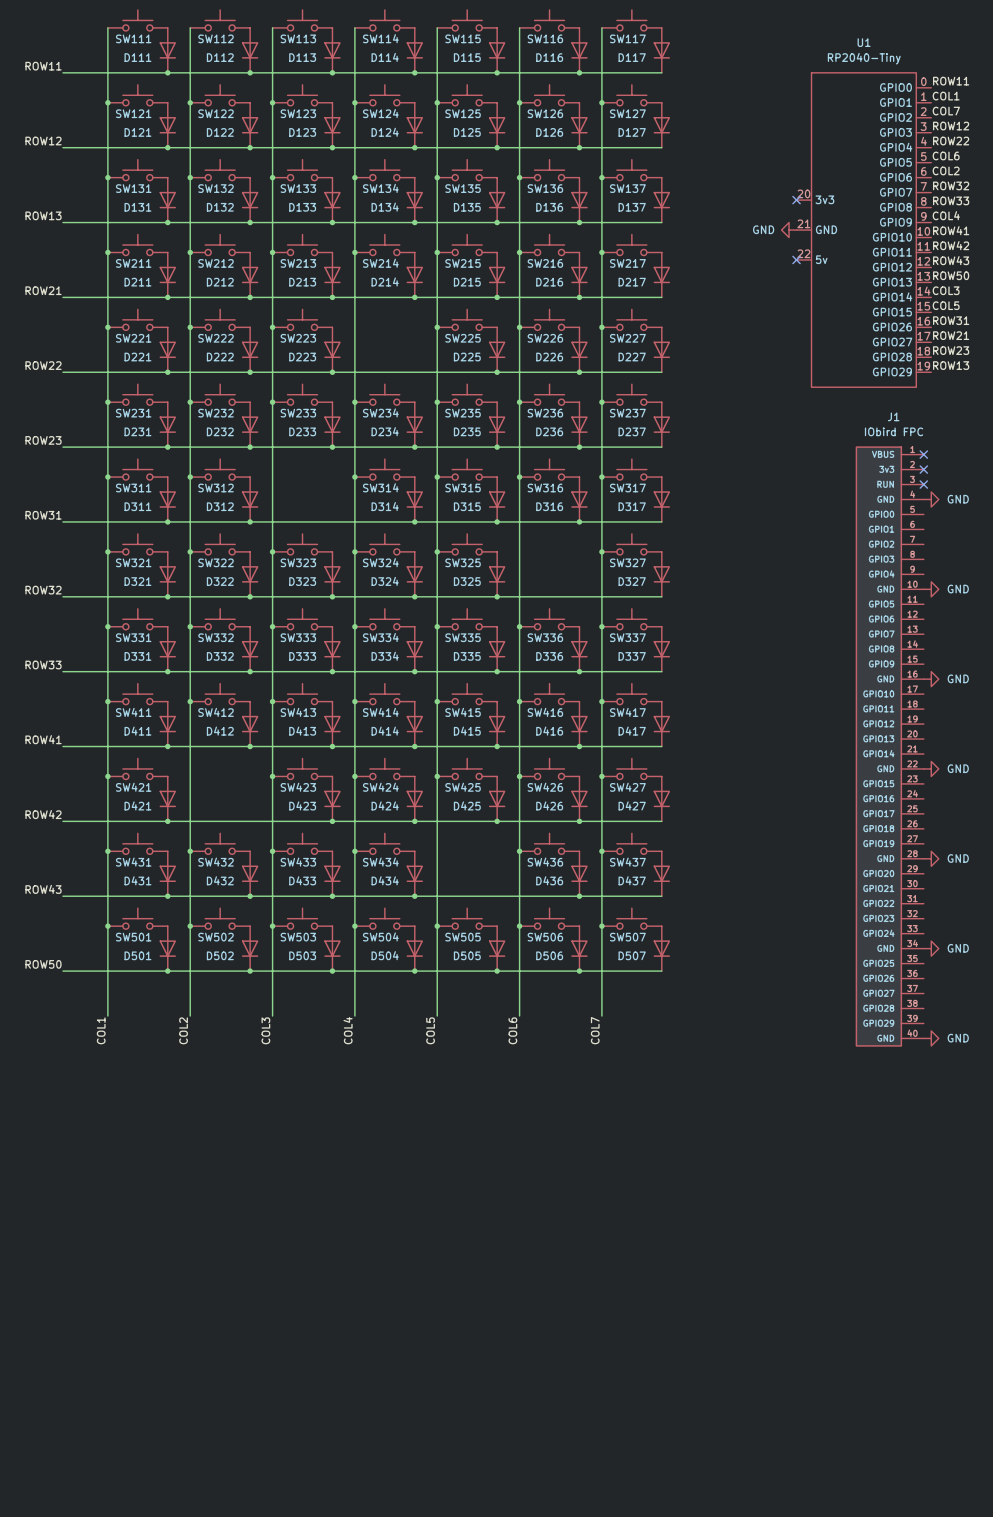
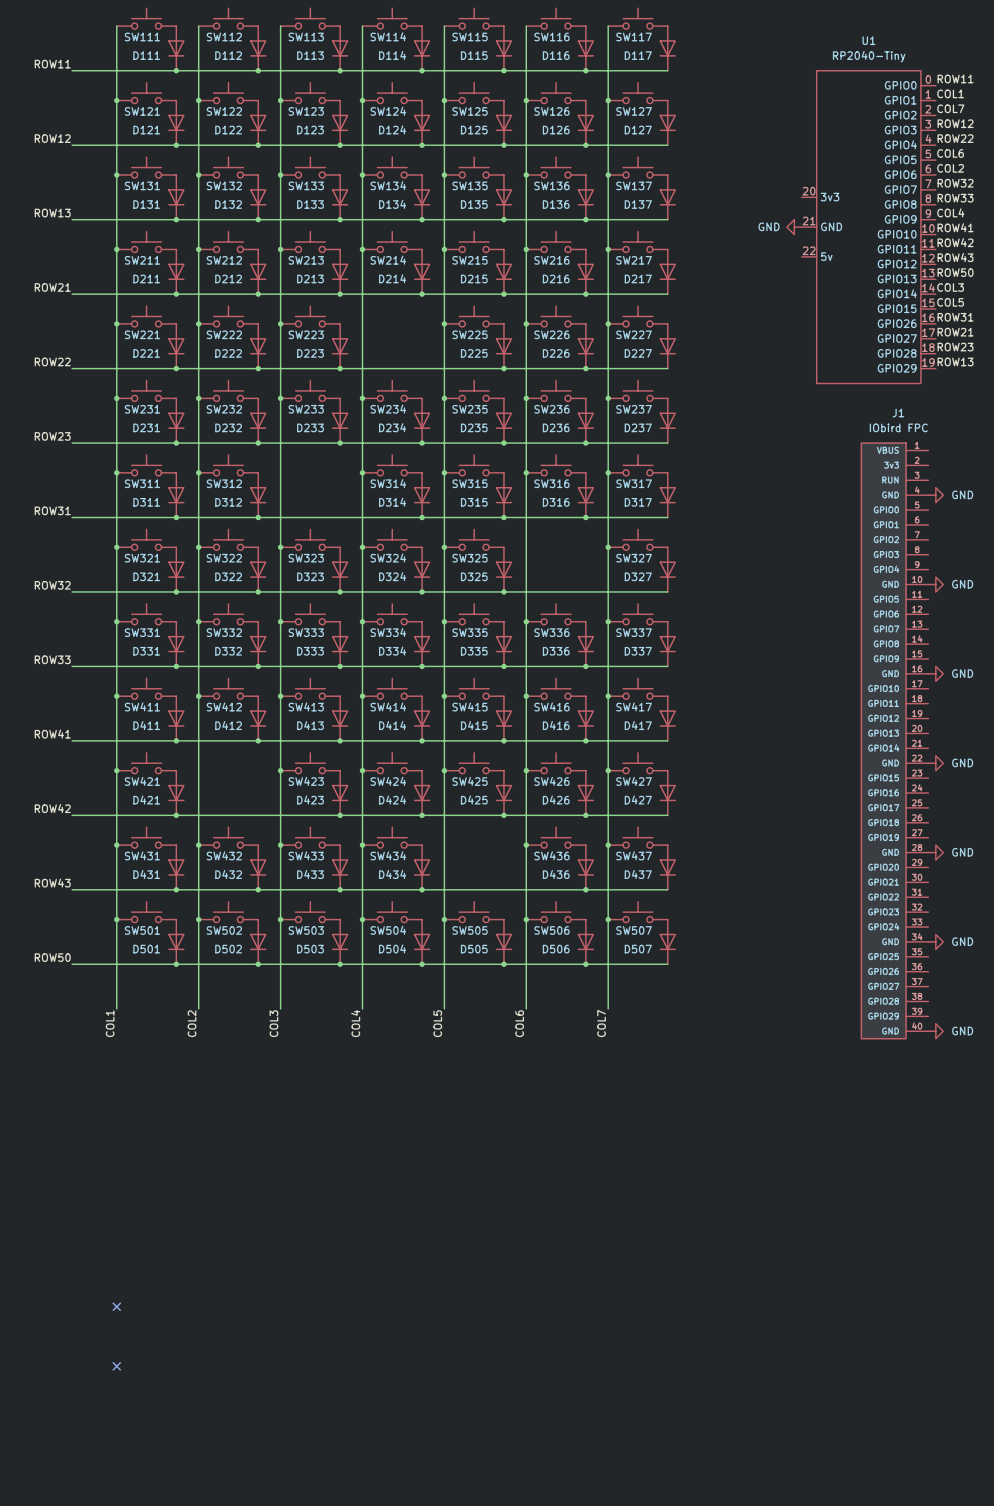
no-connect mark: (796, 200) -> none
no-connect mark: (796, 259) -> none
no-connect mark: (923, 454) -> none
no-connect mark: (923, 469) -> none
no-connect mark: (923, 484) -> none
no-connect mark: none -> (116, 1306)
no-connect mark: none -> (116, 1366)

